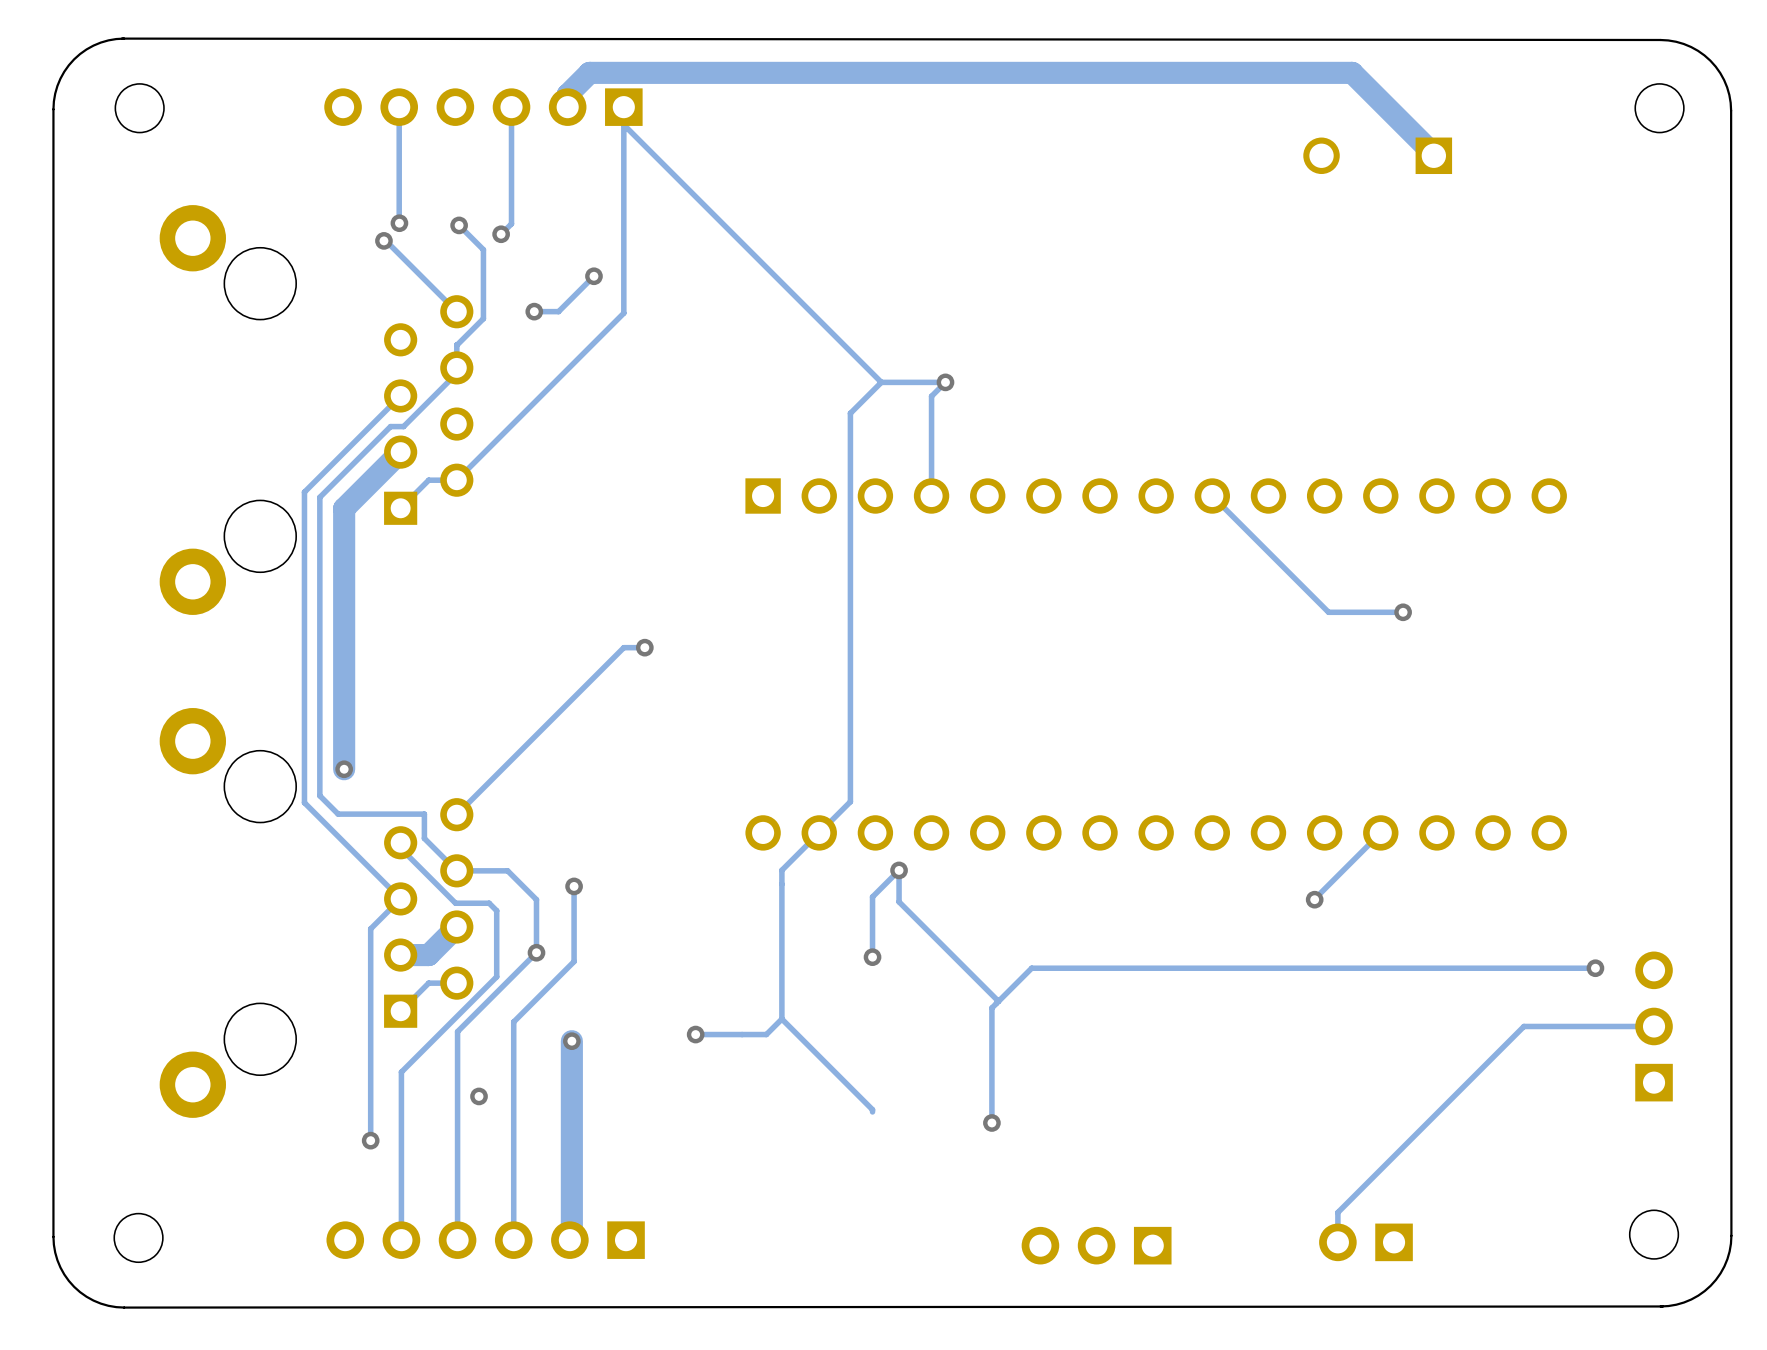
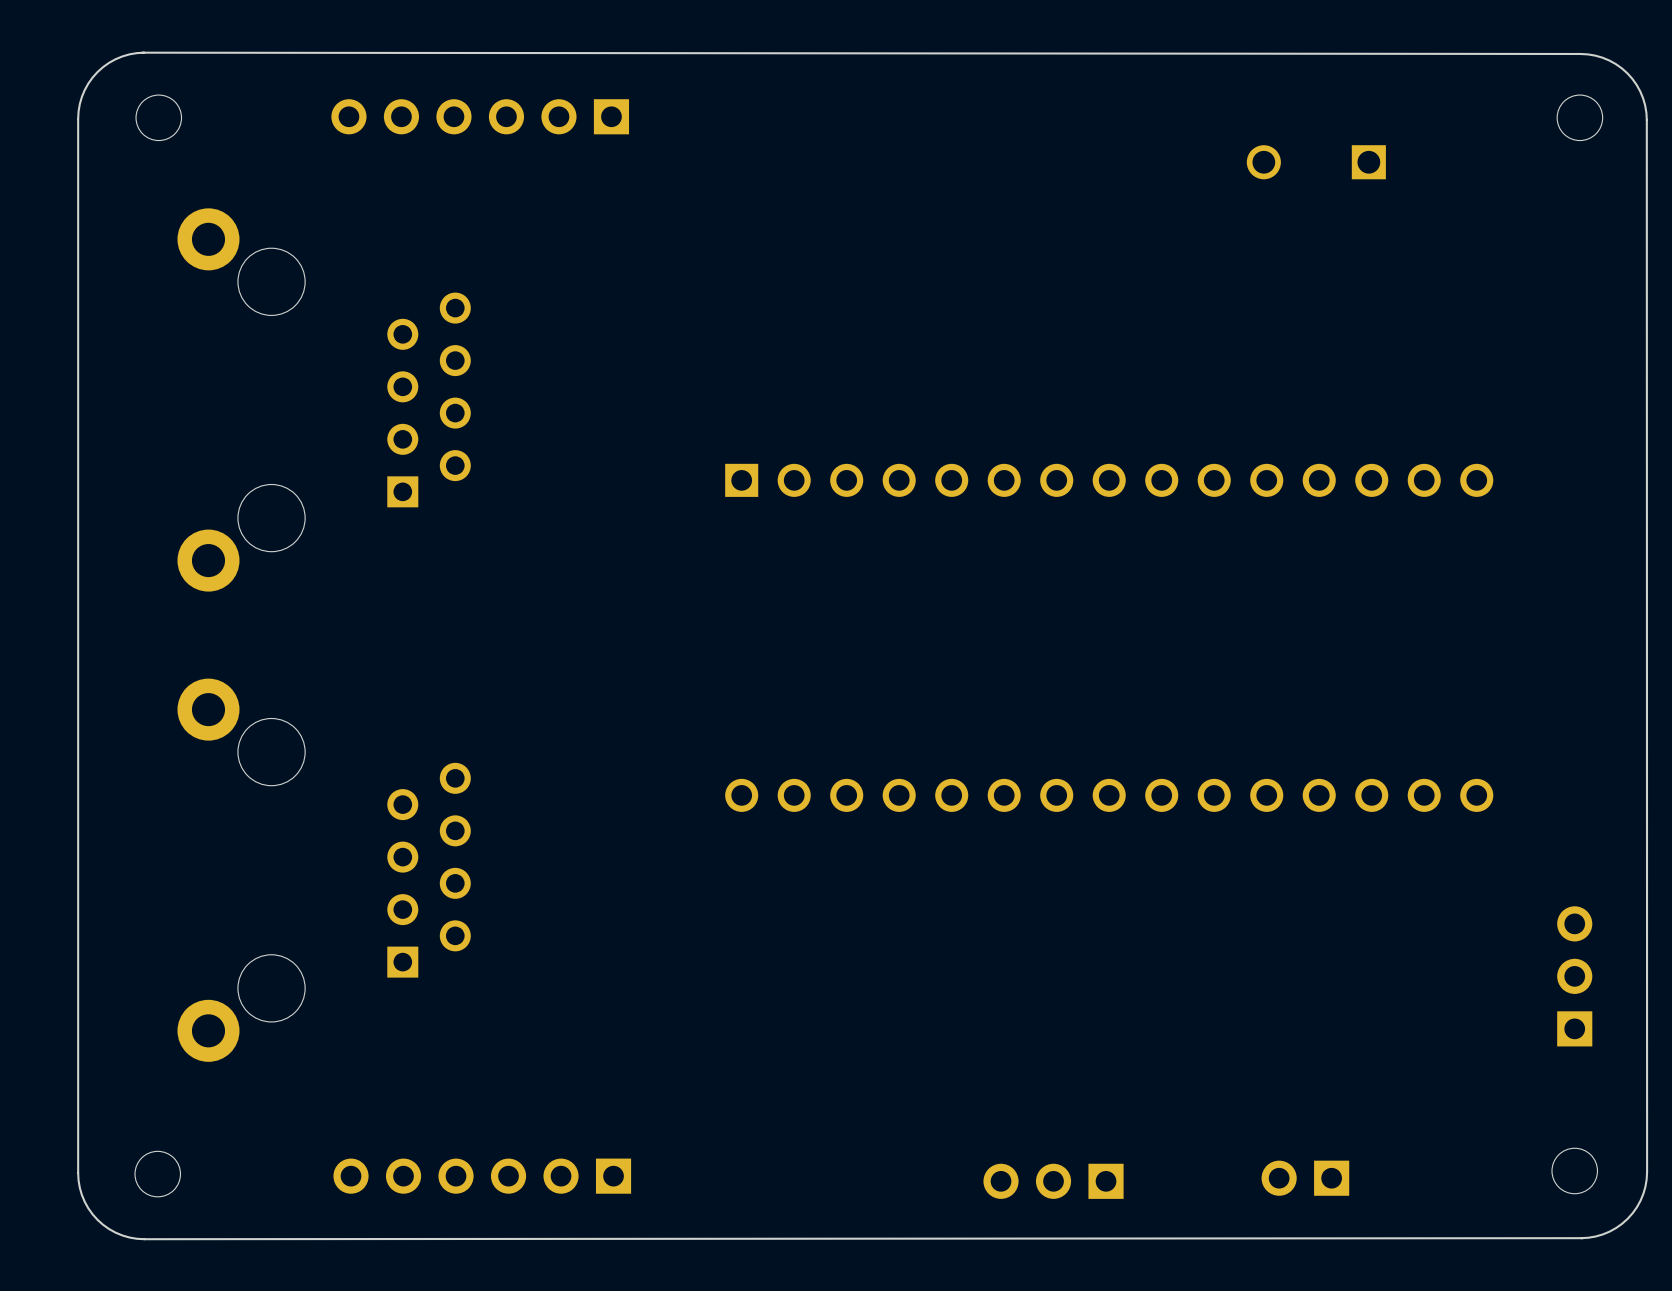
track: (399, 107) (399, 222) -> none
track: (511, 107) (511, 223) (501, 234) -> none
track: (567, 107) (567, 94) (589, 72) (1352, 72) (1433, 155) -> none
track: (623, 107) (623, 313) (456, 480) (428, 480) (400, 508) -> none
track: (623, 124) (881, 382) -> none
via: (399, 223) -> none
track: (459, 225) (483, 249) (483, 318) (457, 344) -> none
via: (459, 225) -> none
via: (501, 234) -> none
track: (383, 240) (456, 311) -> none
via: (383, 240) -> none
track: (593, 276) (558, 311) (534, 311) -> none
via: (593, 276) -> none
via: (534, 311) -> none
track: (456, 344) (456, 373) (403, 426) (390, 426) (319, 497) (319, 795) (338, 814) (424, 814) (424, 838) (456, 870) (507, 870) (536, 899) (536, 952) (457, 1031) (457, 1240) -> none
track: (881, 382) (850, 413) (850, 801) (781, 870) (781, 1019) -> none
track: (881, 382) (945, 382) (931, 396) (931, 496) -> none
via: (945, 382) -> none
track: (400, 395) (304, 492) (304, 802) (400, 898) (370, 928) (370, 1140) -> none
track: (400, 452) (344, 508) (344, 769) -> none
track: (1212, 496) (1328, 612) (1403, 612) -> none
via: (1403, 612) -> none
track: (644, 647) (623, 647) (456, 814) -> none
via: (644, 647) -> none
via: (344, 769) -> none
track: (1380, 832) (1314, 899) -> none
track: (400, 842) (400, 848) (455, 903) (489, 903) (496, 910) (496, 976) (401, 1072) (401, 1240) -> none
via: (899, 870) -> none
track: (574, 886) (574, 961) (513, 1021) (513, 1240) -> none
via: (574, 886) -> none
via: (1314, 899) -> none
track: (456, 926) (428, 955) (400, 955) -> none
via: (536, 952) -> none
track: (872, 957) (872, 896) (899, 870) (899, 901) (998, 1001) -> none
via: (872, 957) -> none
track: (1595, 968) (1031, 968) (991, 1008) (991, 1122) -> none
via: (1595, 968) -> none
track: (456, 983) (428, 983) (400, 1011) -> none
track: (781, 1019) (872, 1109) (872, 1111) -> none
track: (781, 1019) (766, 1034) (695, 1034) -> none
track: (1654, 1026) (1523, 1026) (1337, 1212) (1337, 1242) -> none
via: (695, 1034) -> none
track: (571, 1041) (571, 1238) (569, 1240) -> none
via: (571, 1041) -> none
via: (479, 1096) -> none
via: (991, 1122) -> none
via: (370, 1140) -> none

